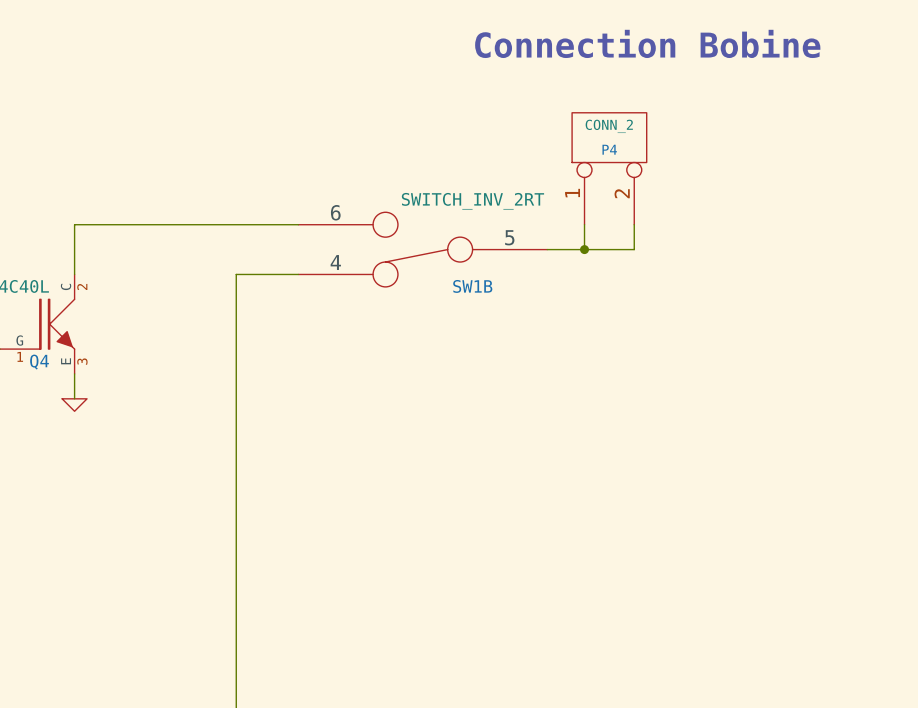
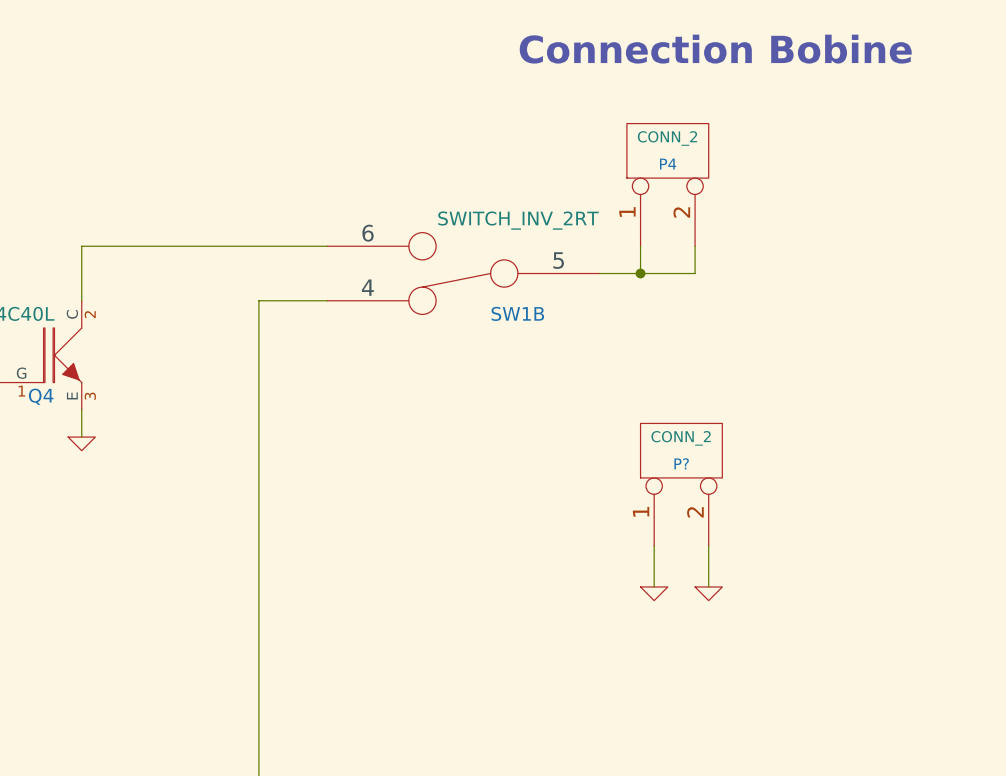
P?: none -> CONN_2 (681, 484)
wire: none -> (654, 546) (654, 586)
wire: none -> (708, 546) (708, 586)
power symbol: none -> (654, 593)
power symbol: none -> (708, 593)

